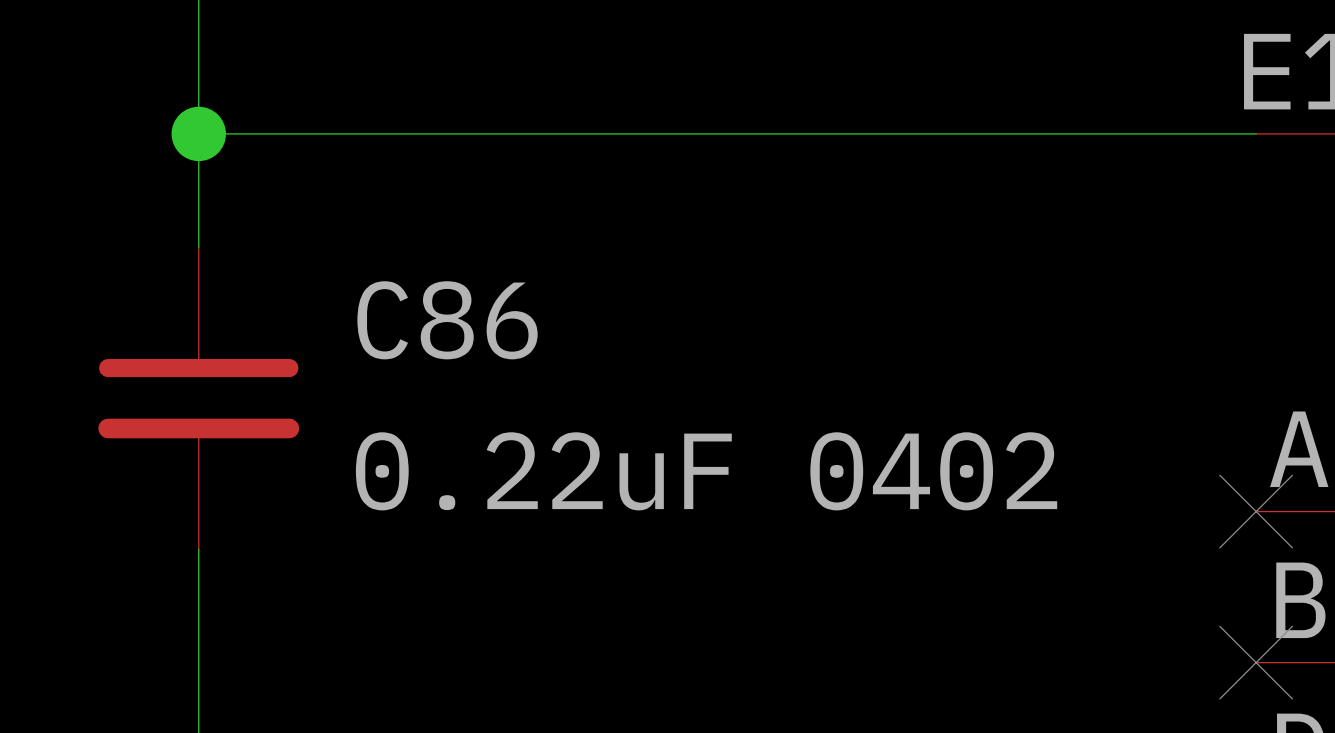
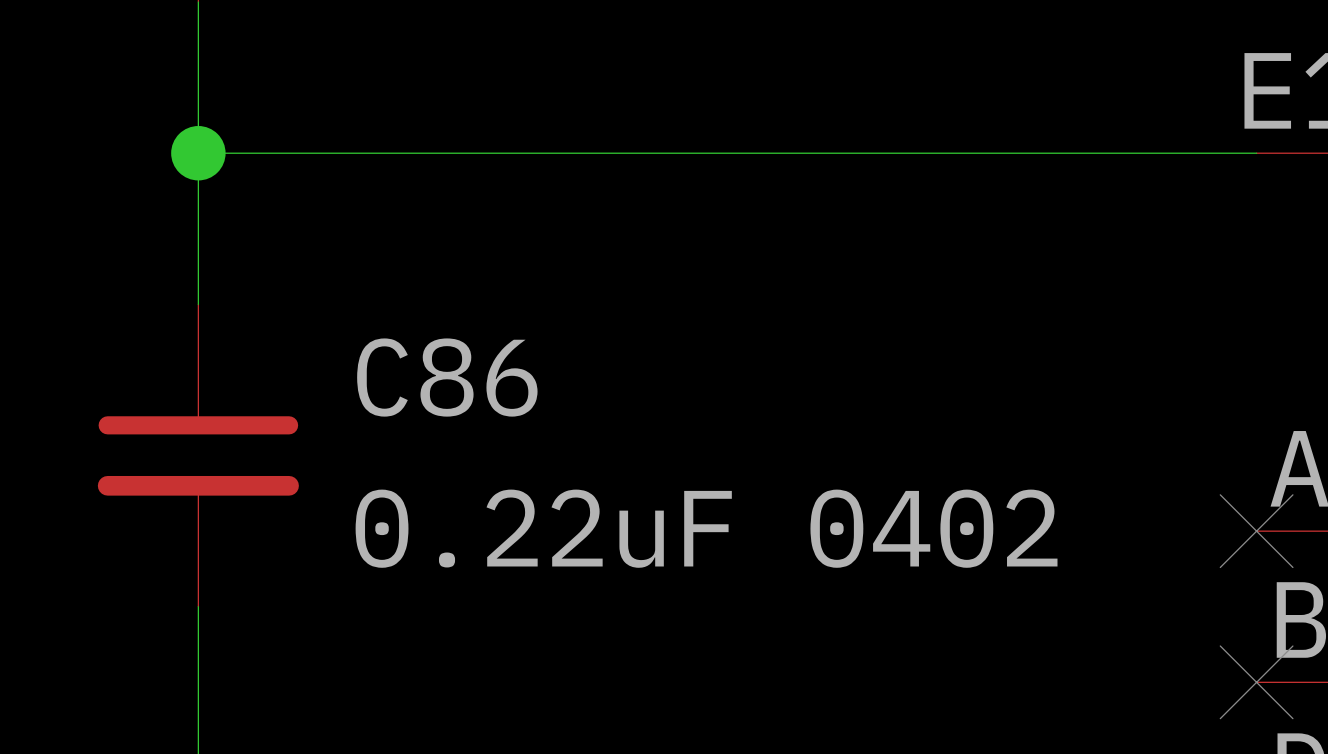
C86 position: (198, 398) -> (198, 455)

